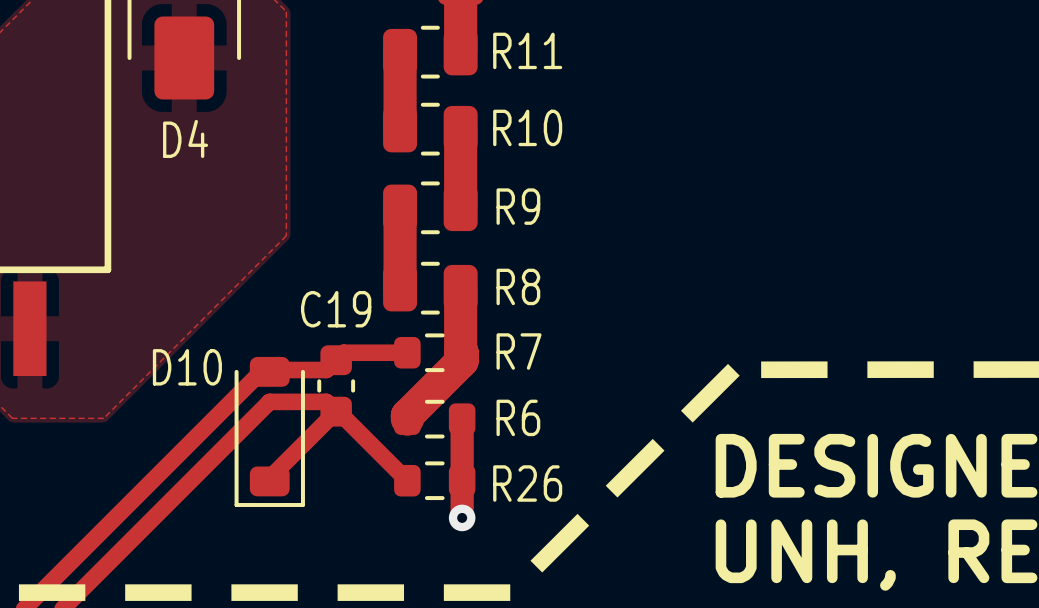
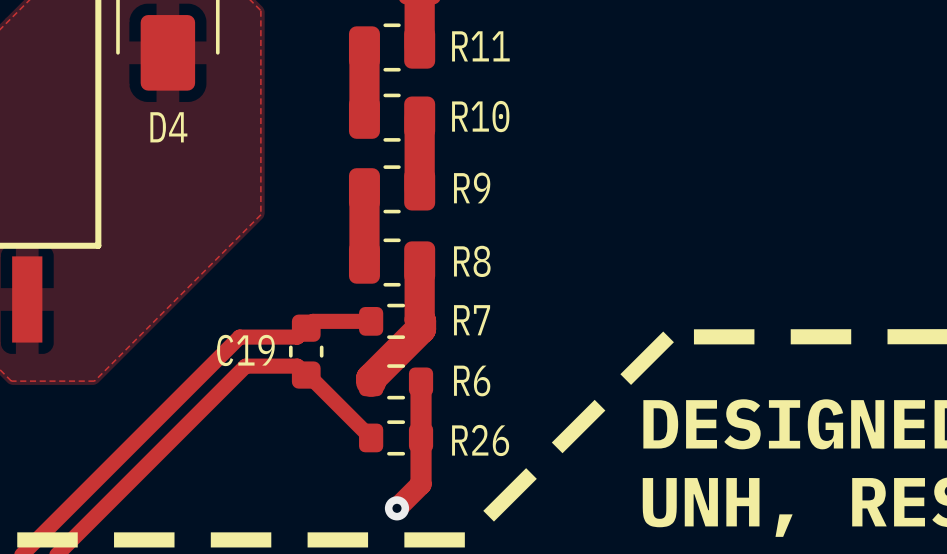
C19 name position: C19 (336, 309) -> C19 (245, 350)
track: (336, 411) (269, 478) (269, 481) -> none
D10: (269, 431) -> none
track: none -> (421, 471) (421, 484) (396, 508)
via position: (462, 517) -> (396, 508)

